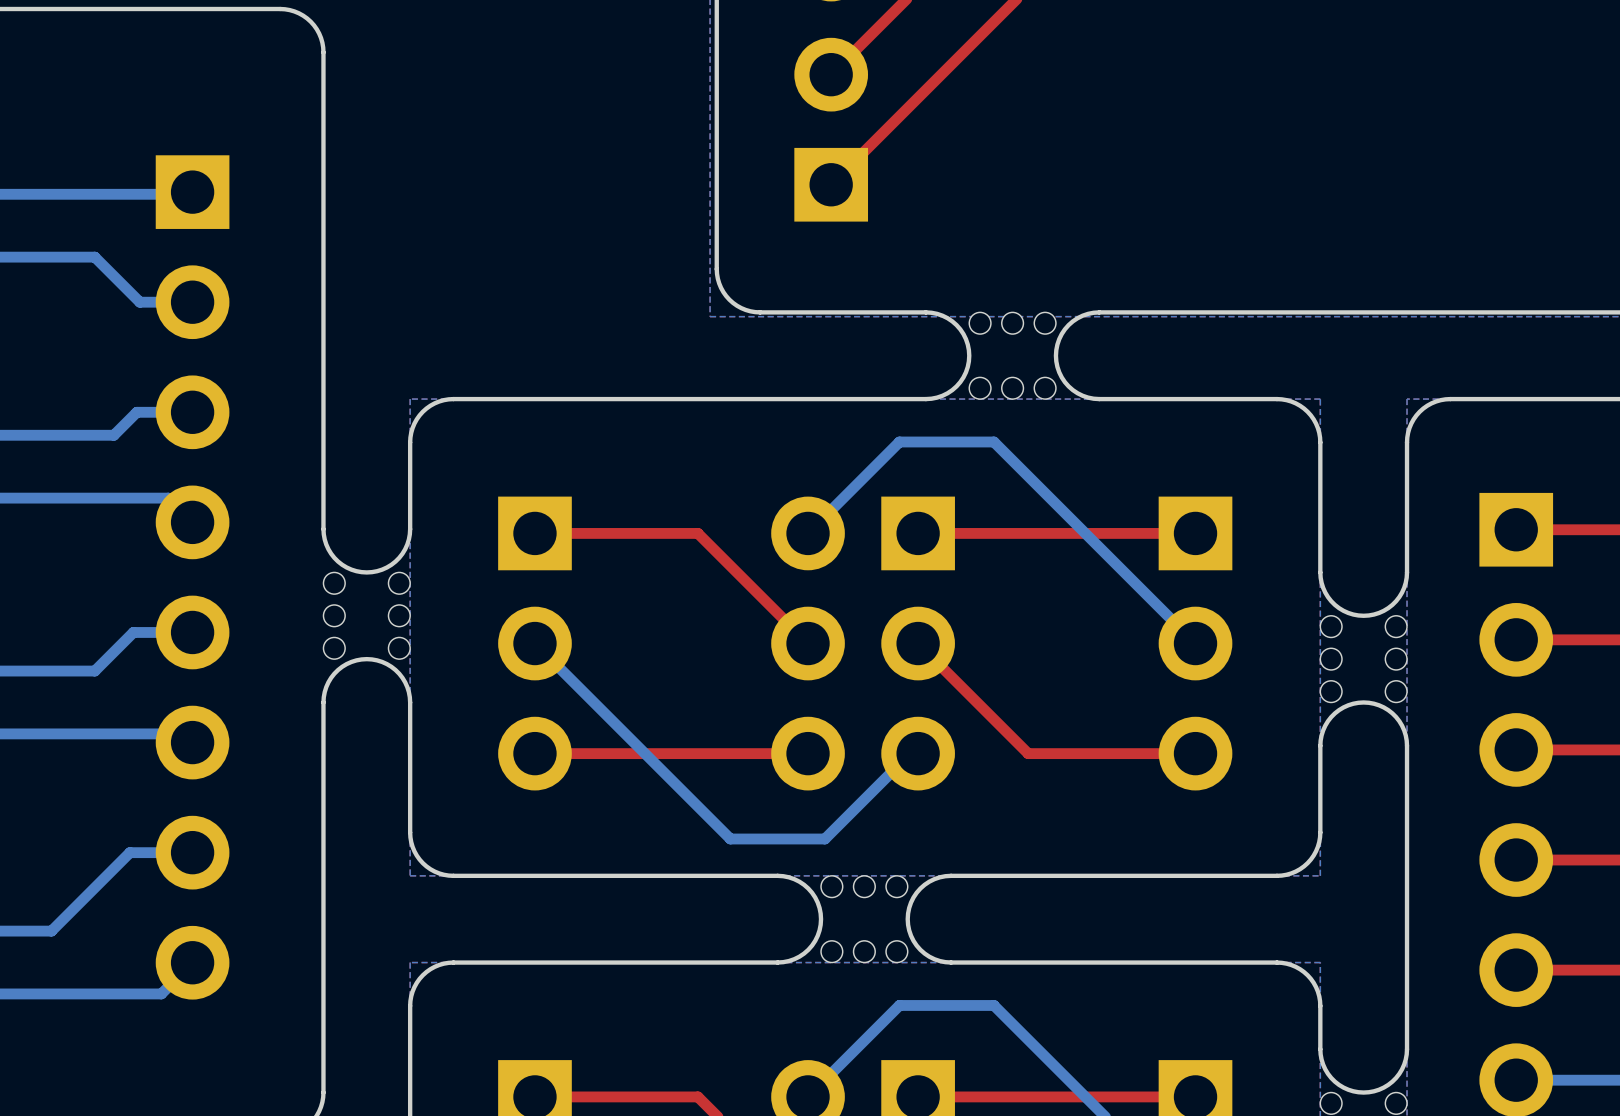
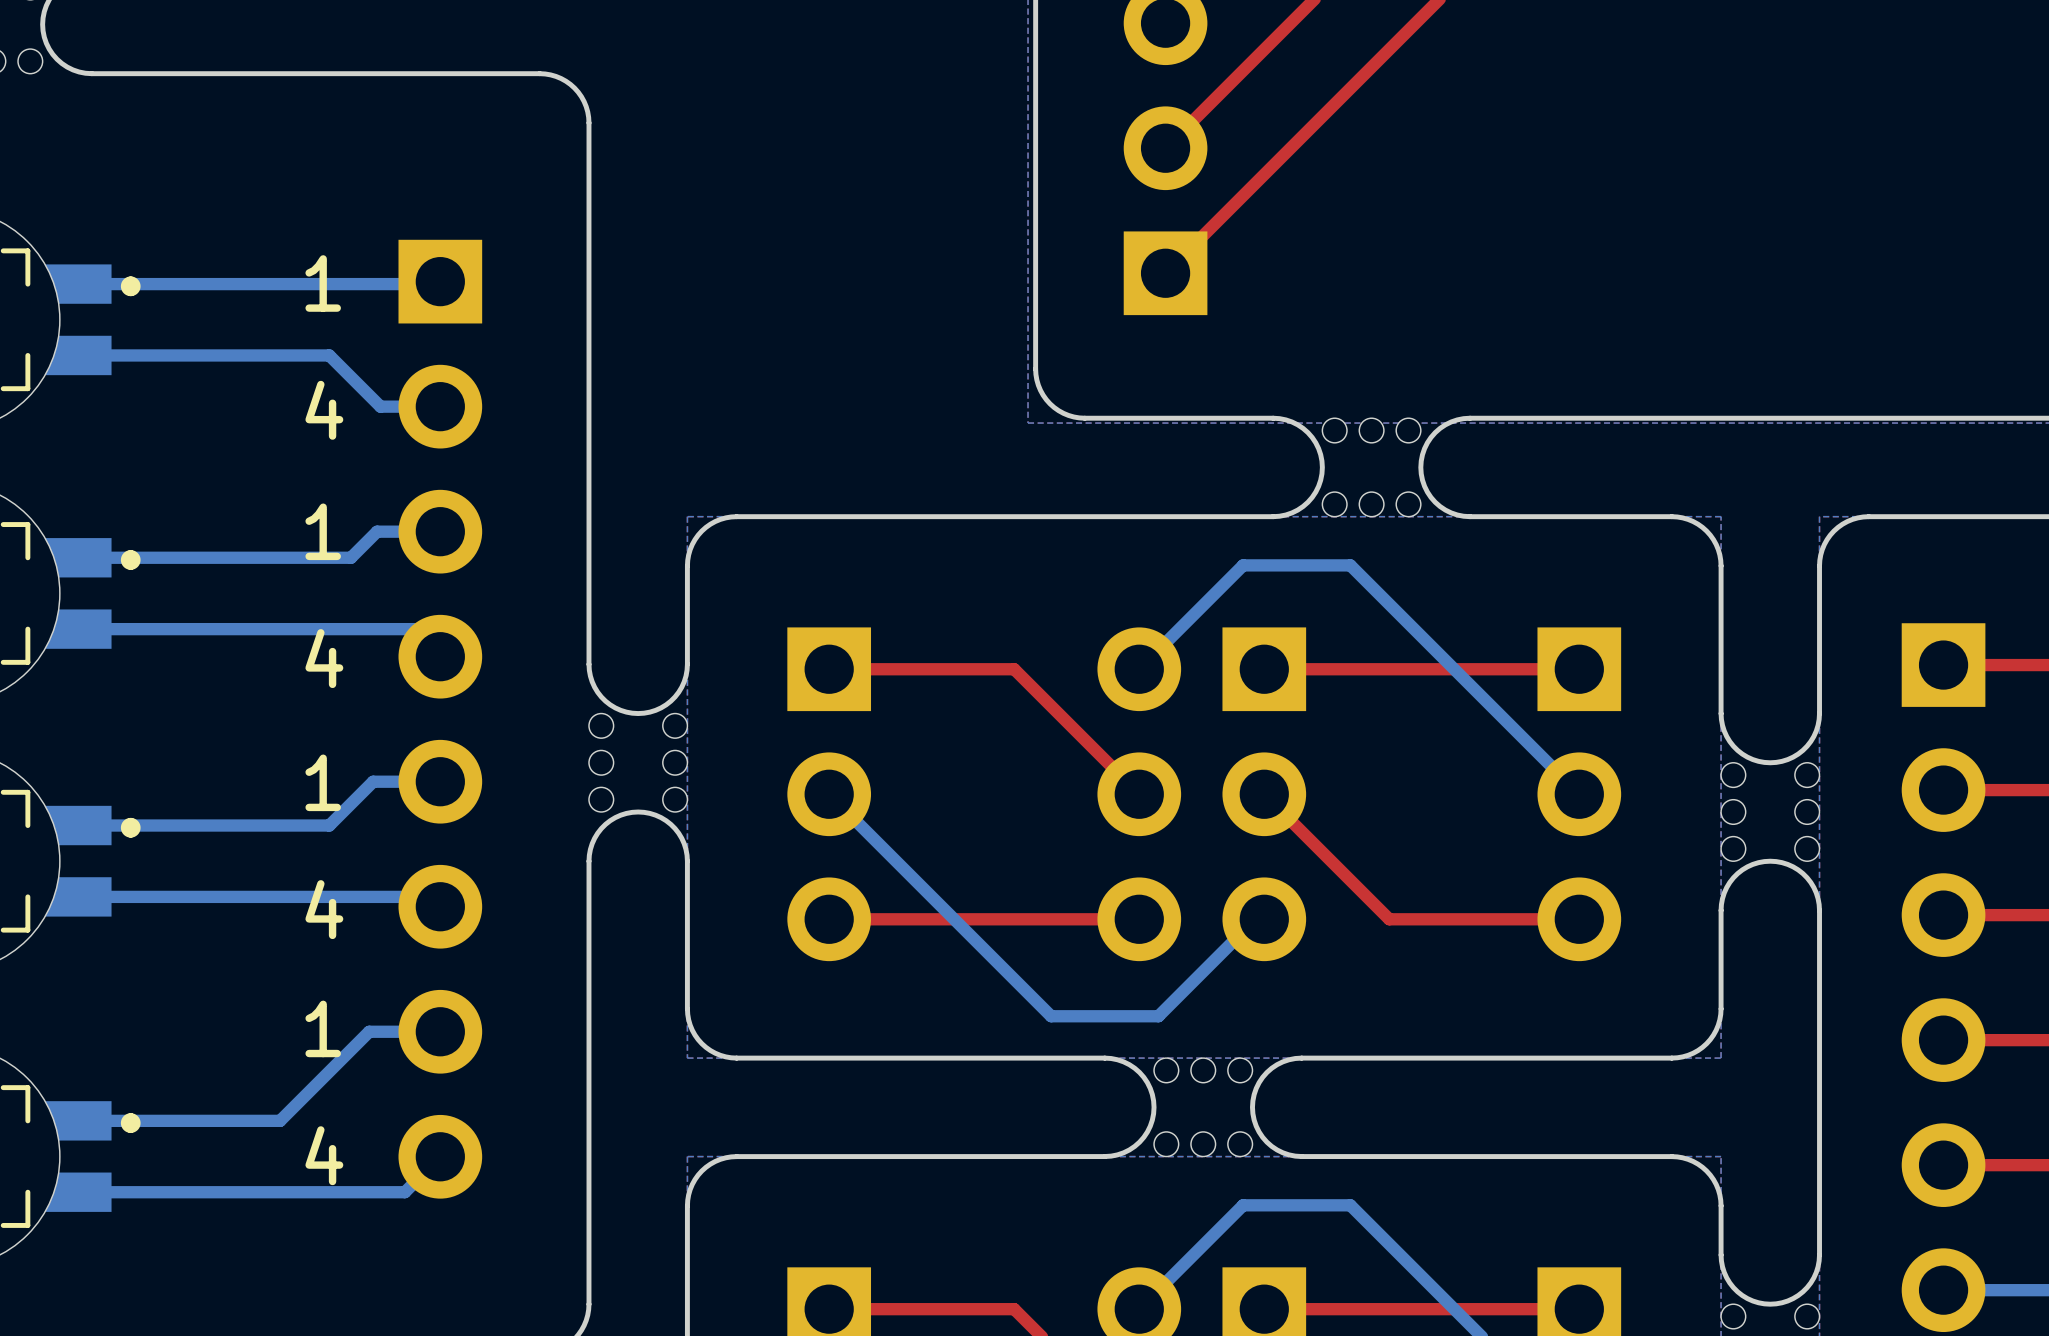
text: none -> 1 (323, 283)
text: none -> 4 (324, 410)
text: none -> 1 (323, 531)
text: none -> 4 (324, 658)
text: none -> 1 (323, 782)
text: none -> 4 (324, 909)
text: none -> 1 (323, 1028)
text: none -> 4 (324, 1155)

